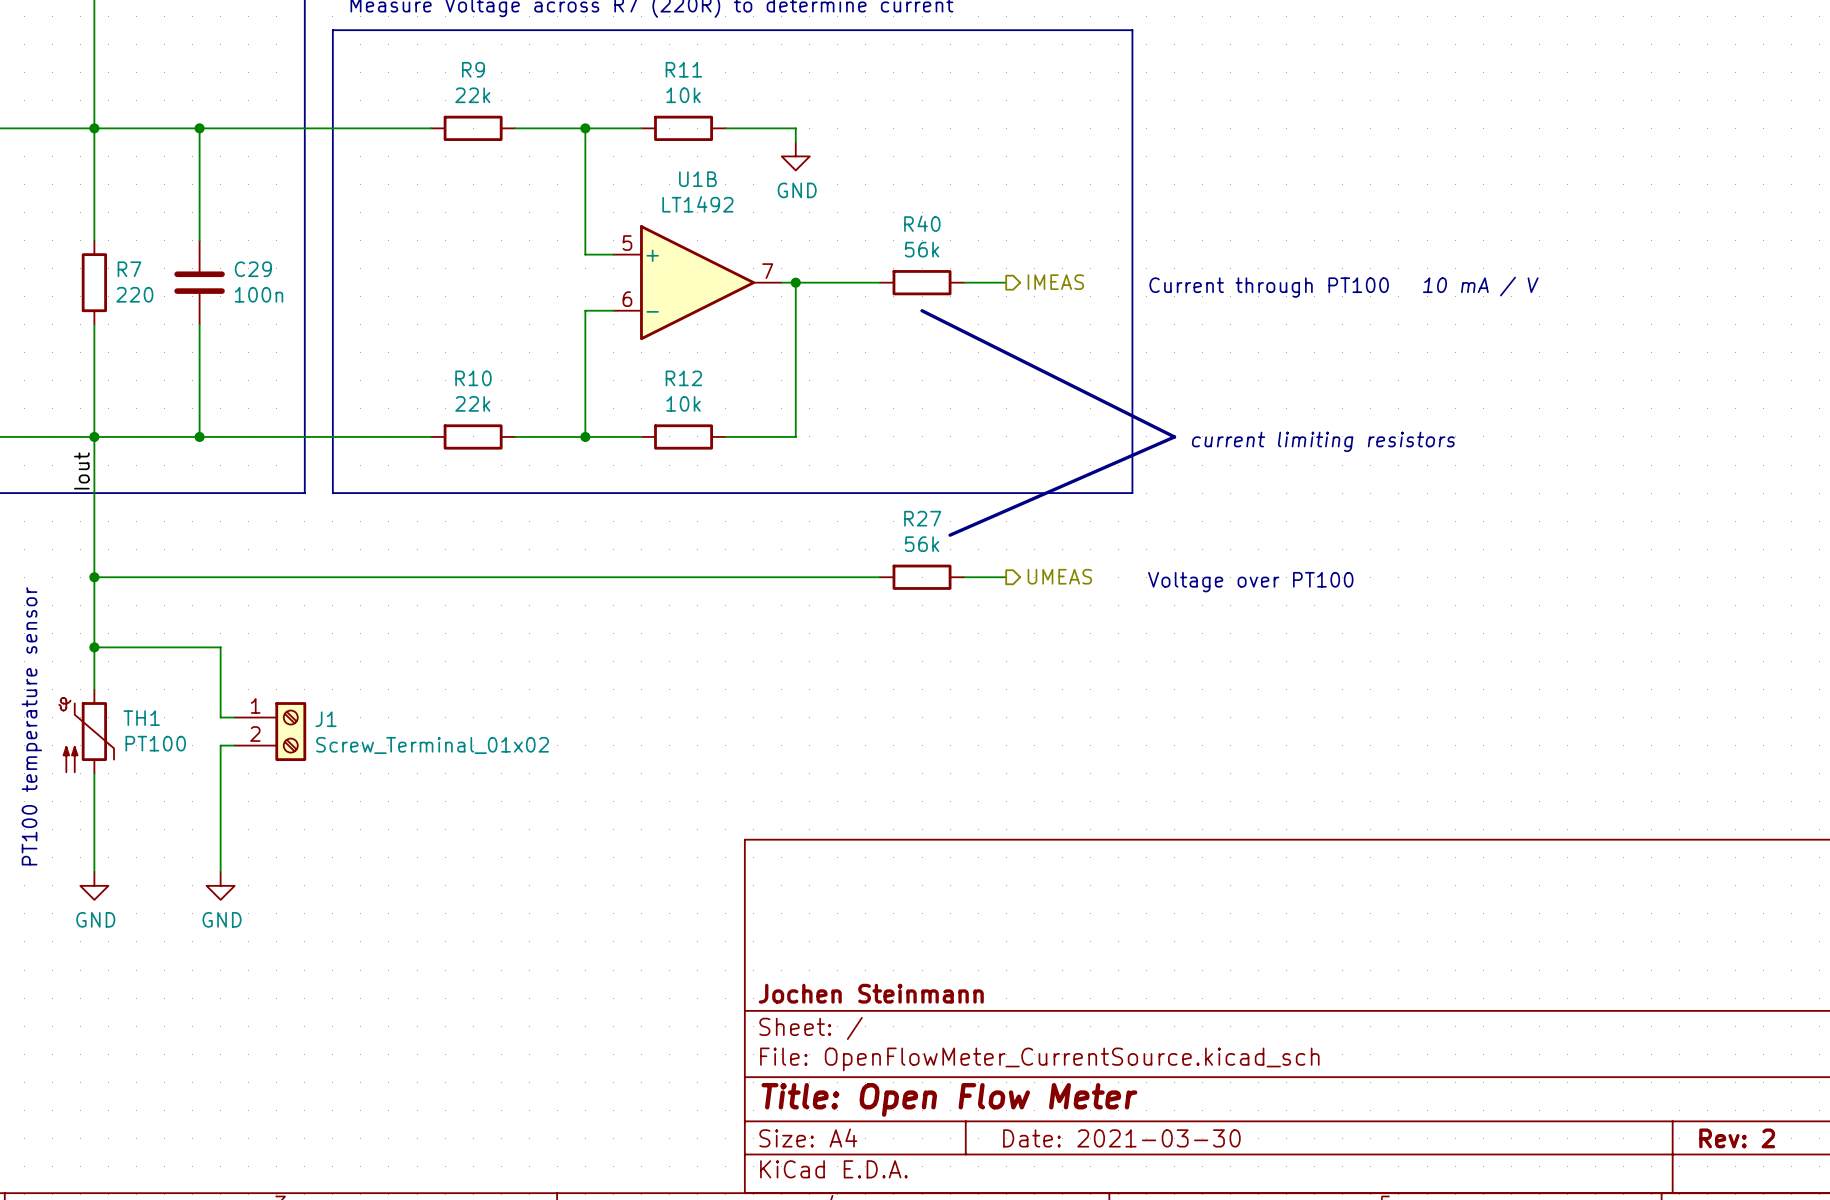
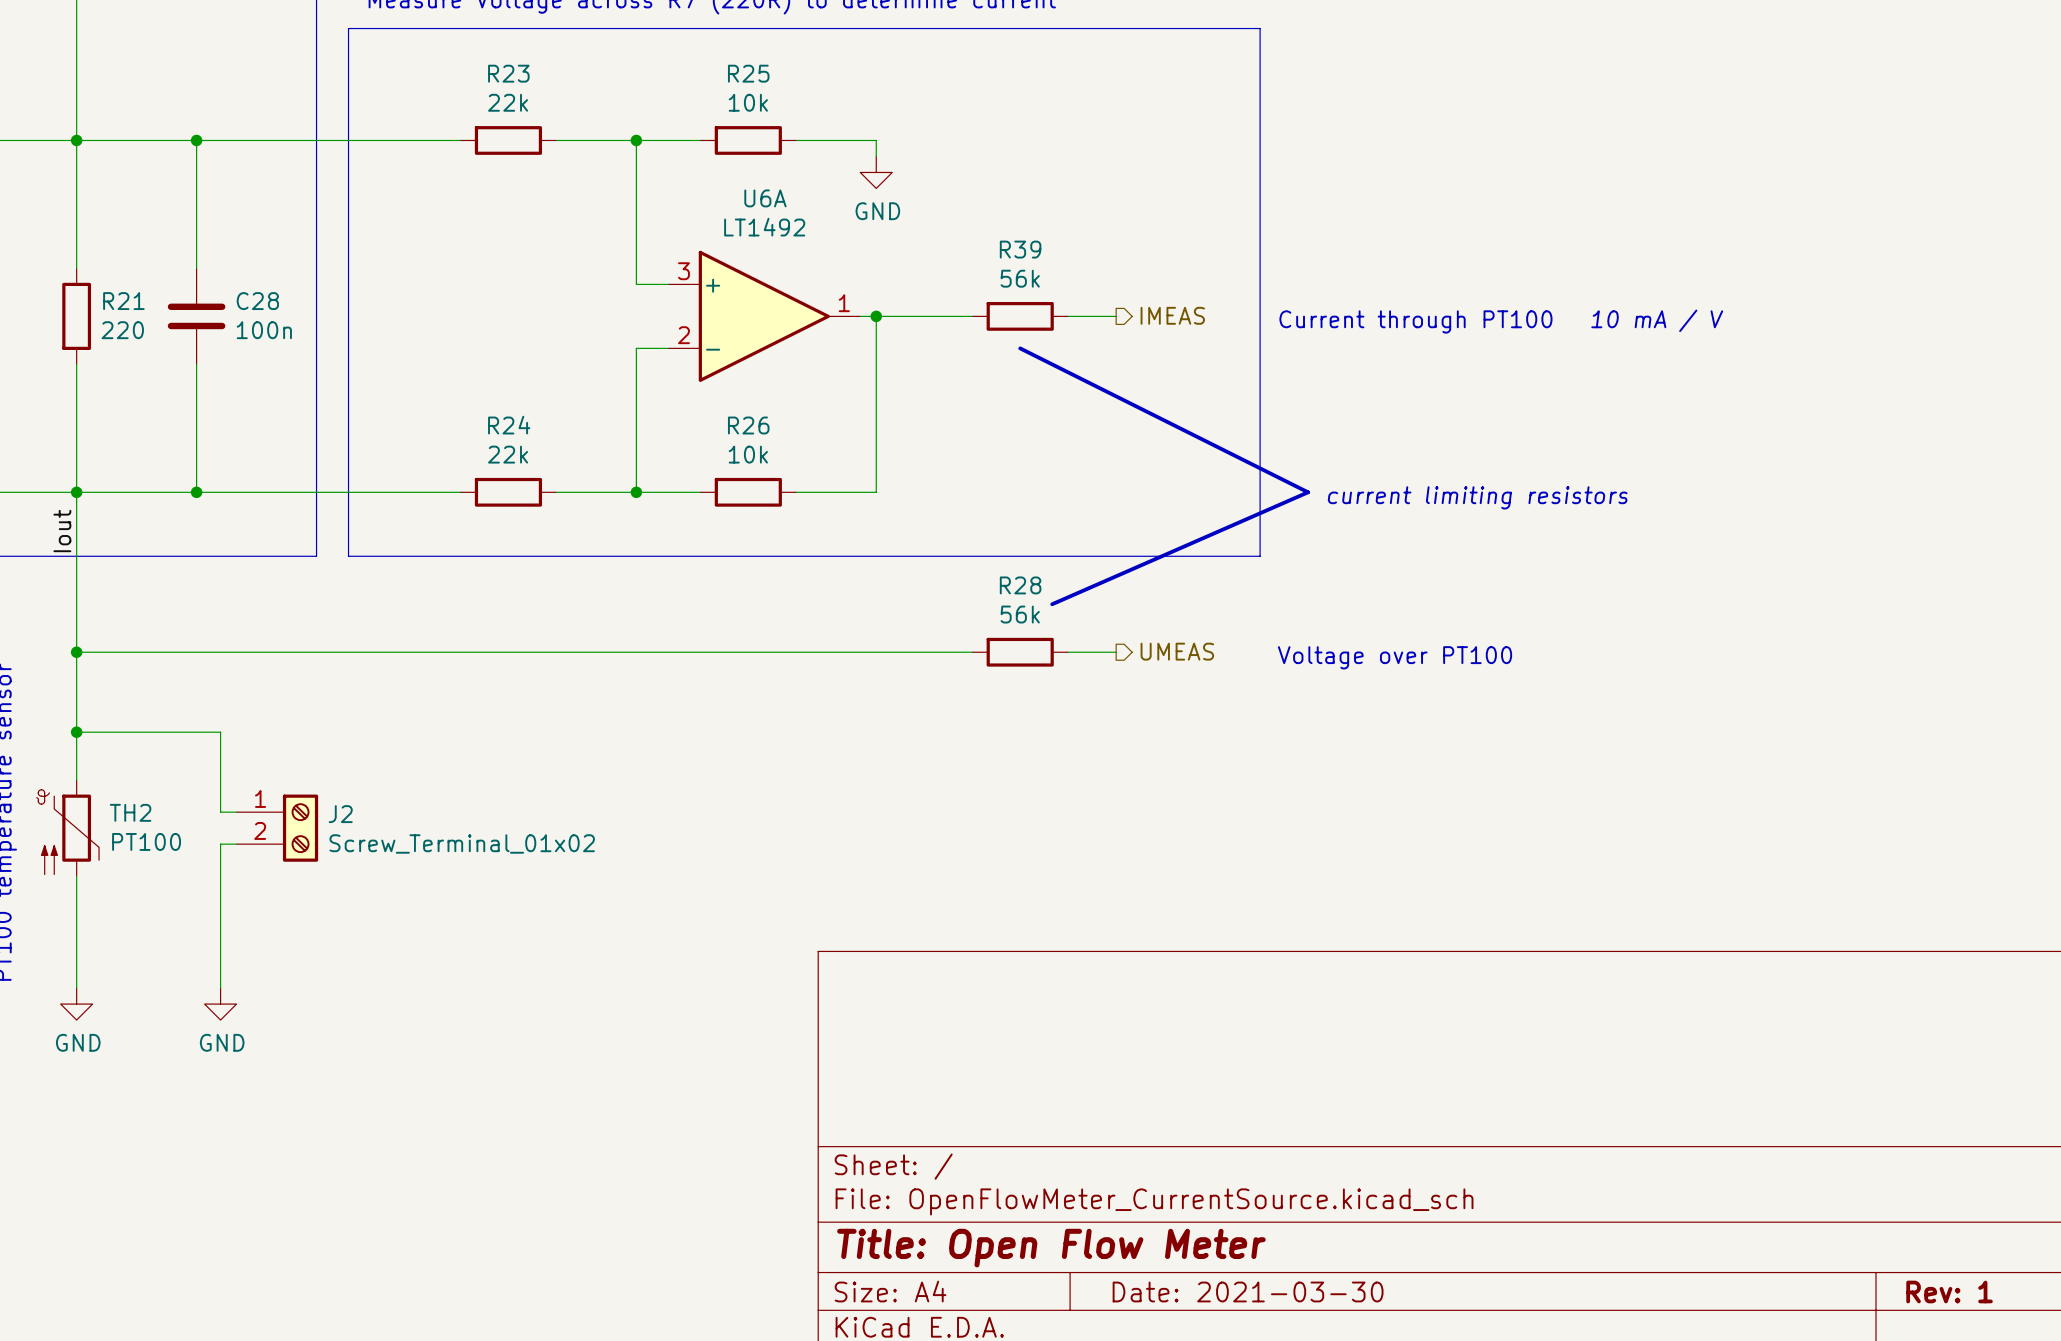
R9 name: R9 (473, 69) -> R23 (508, 73)
R11 name: R11 (683, 69) -> R25 (748, 73)
U1B name: U1B (697, 179) -> U6A (765, 198)
R40 name: R40 (922, 223) -> R39 (1020, 249)
U1B pin number: 5 (627, 243) -> 3 (683, 271)
R7 name: R7 (129, 269) -> R21 (123, 301)
C29 name: C29 (253, 269) -> C28 (257, 301)
U1B pin number: 7 (767, 271) -> 1 (844, 303)
U1B pin number: 6 (627, 299) -> 2 (683, 335)
R10 name: R10 (473, 378) -> R24 (509, 425)
R12 name: R12 (683, 378) -> R26 (748, 425)
R27 name: R27 (922, 518) -> R28 (1020, 585)
TH1 name: TH1 (141, 718) -> TH2 (130, 812)
J1 name: J1 (326, 719) -> J2 (340, 814)
title block: Jochen Steinmann (871, 993) -> none
title block: Rev: 2 (1737, 1138) -> Rev: 1 (1949, 1291)

